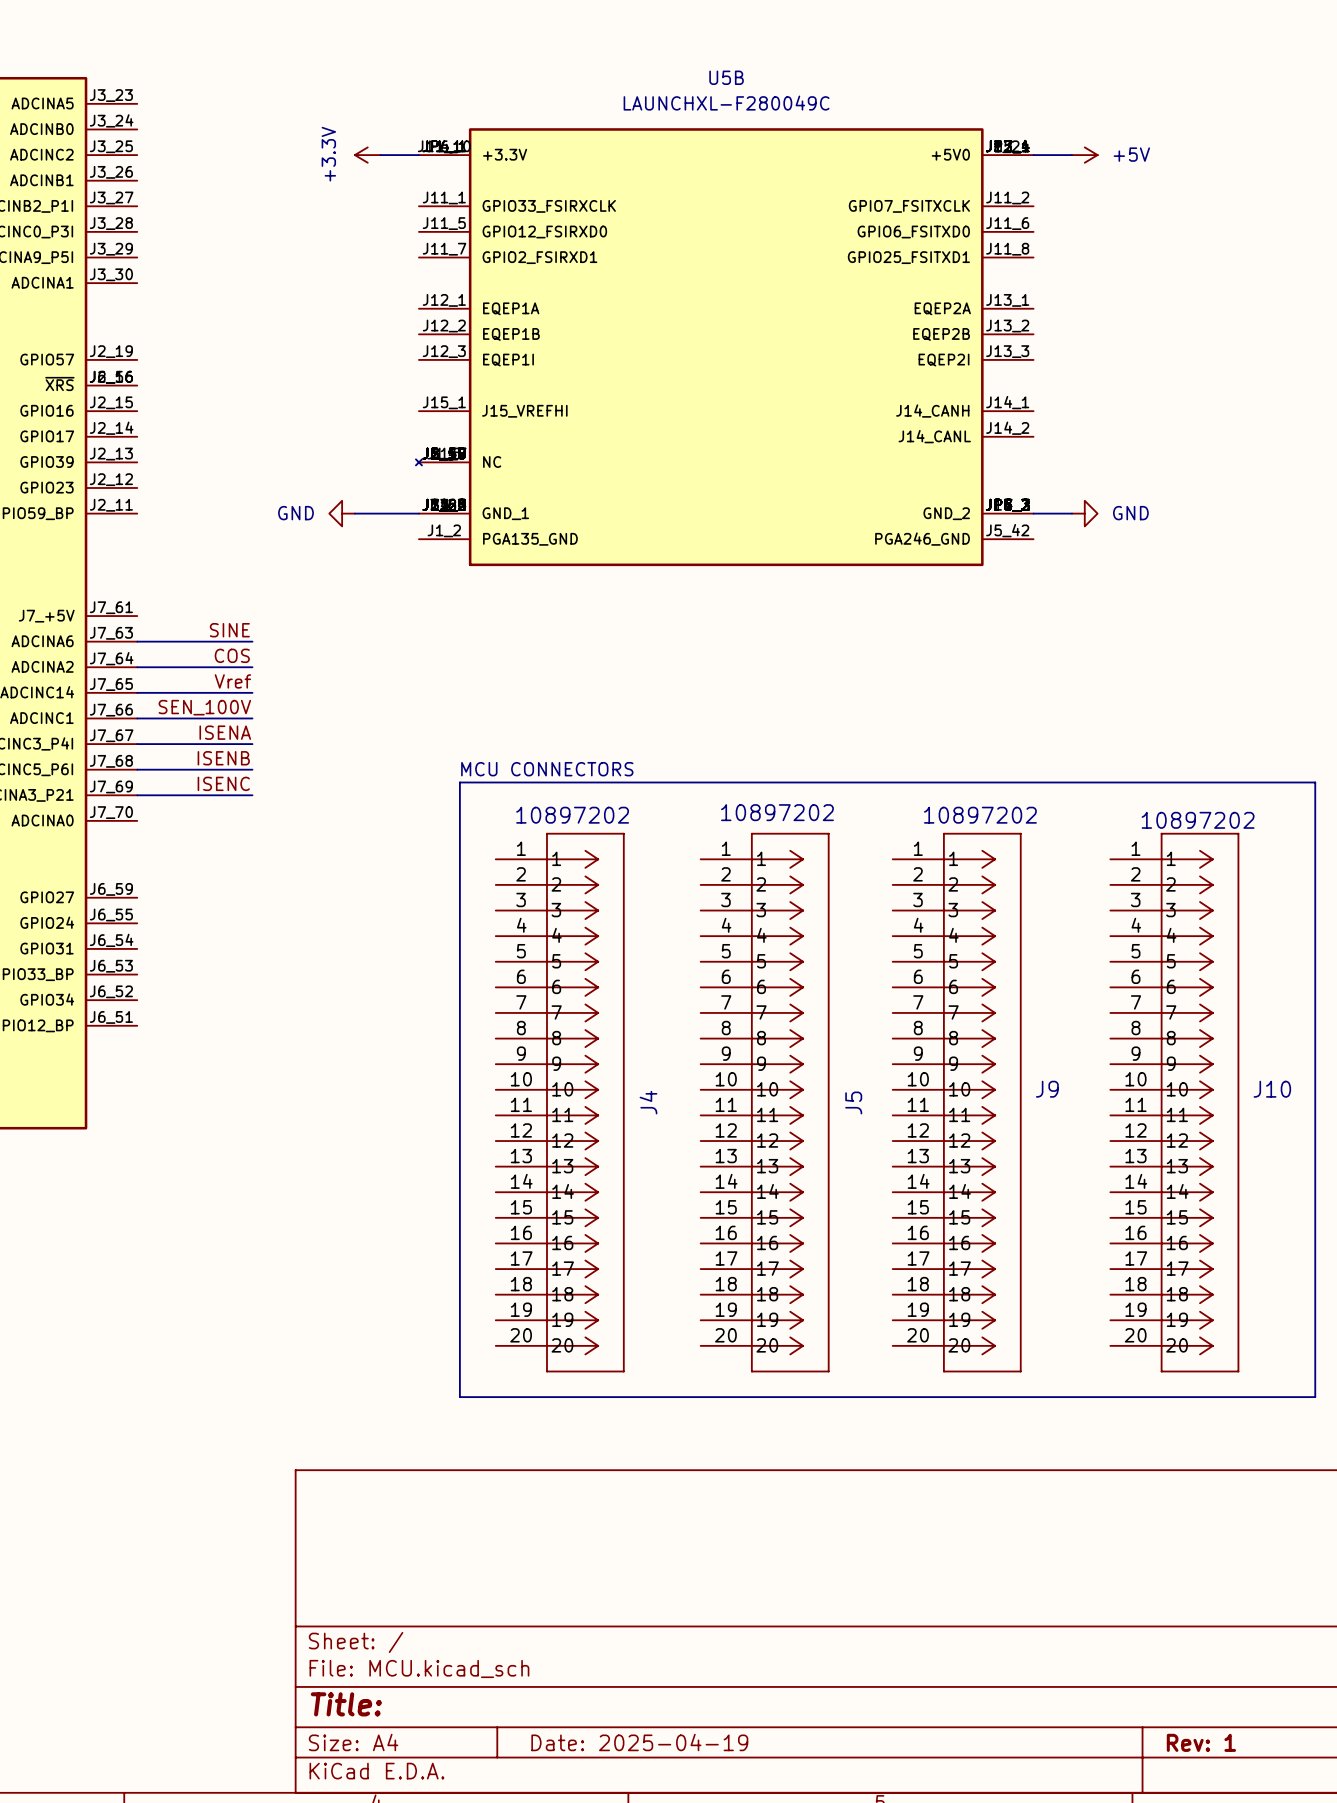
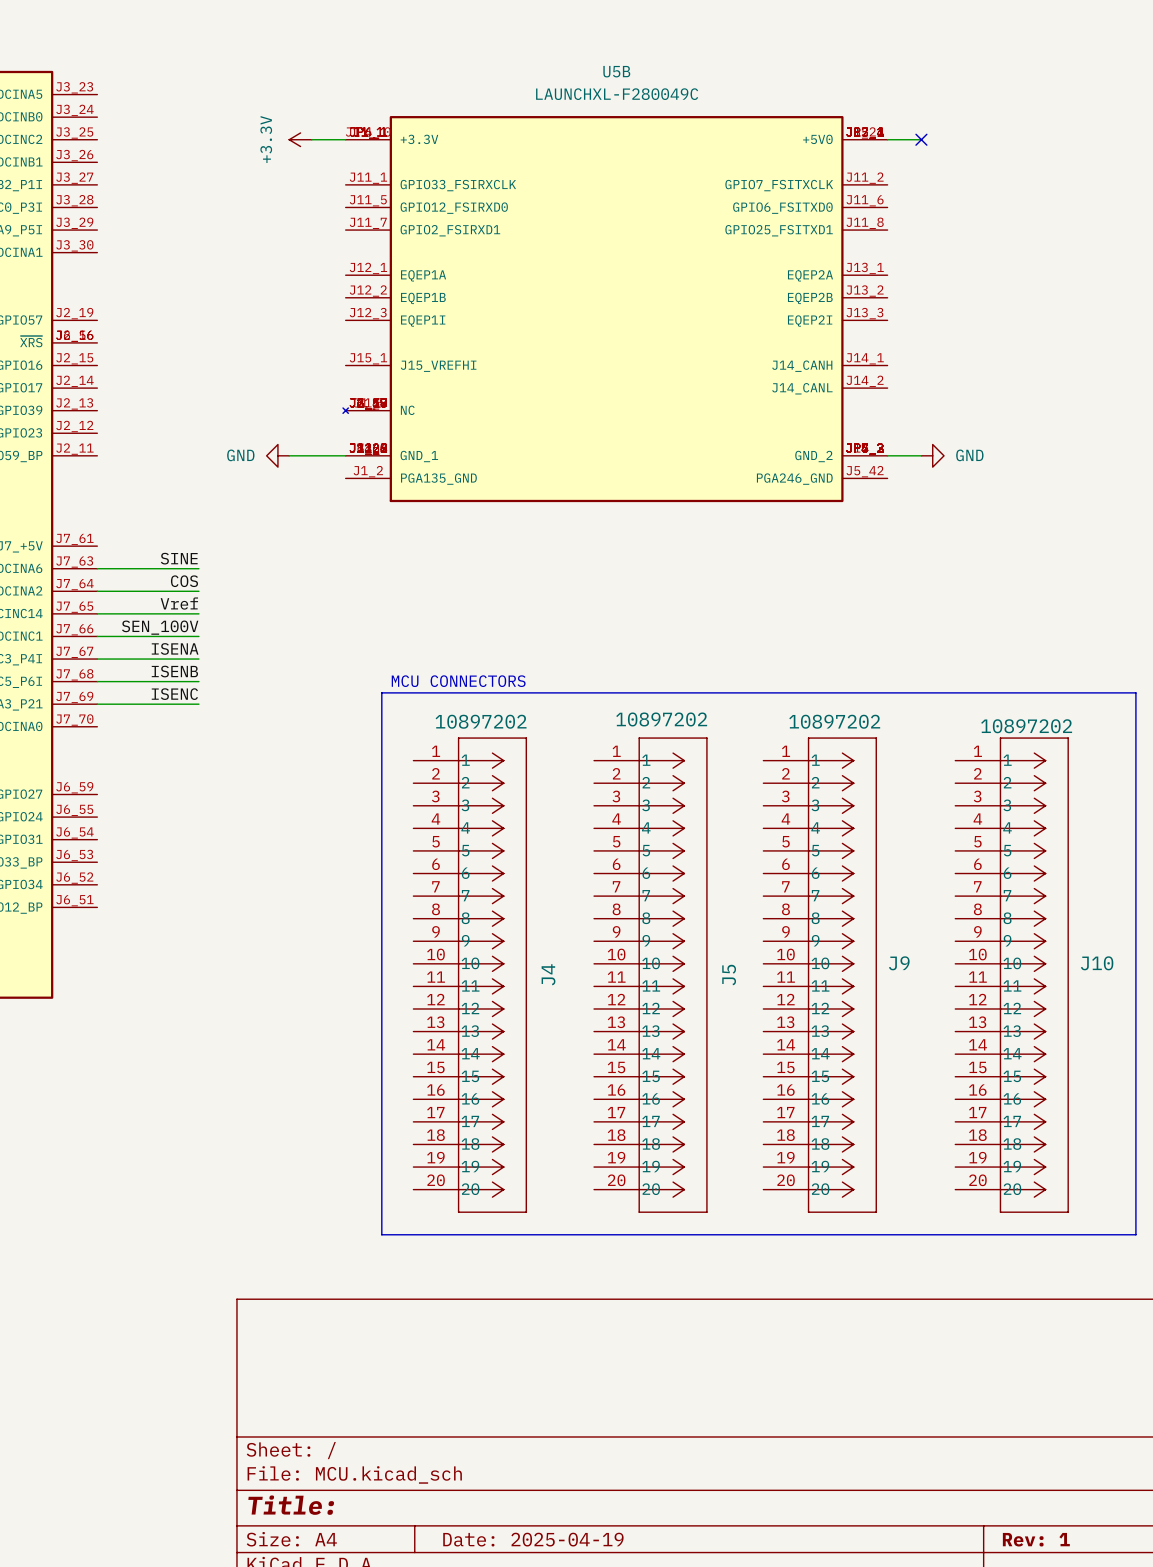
no-connect mark: none -> (921, 139)
power symbol: +5V (1084, 155) -> none

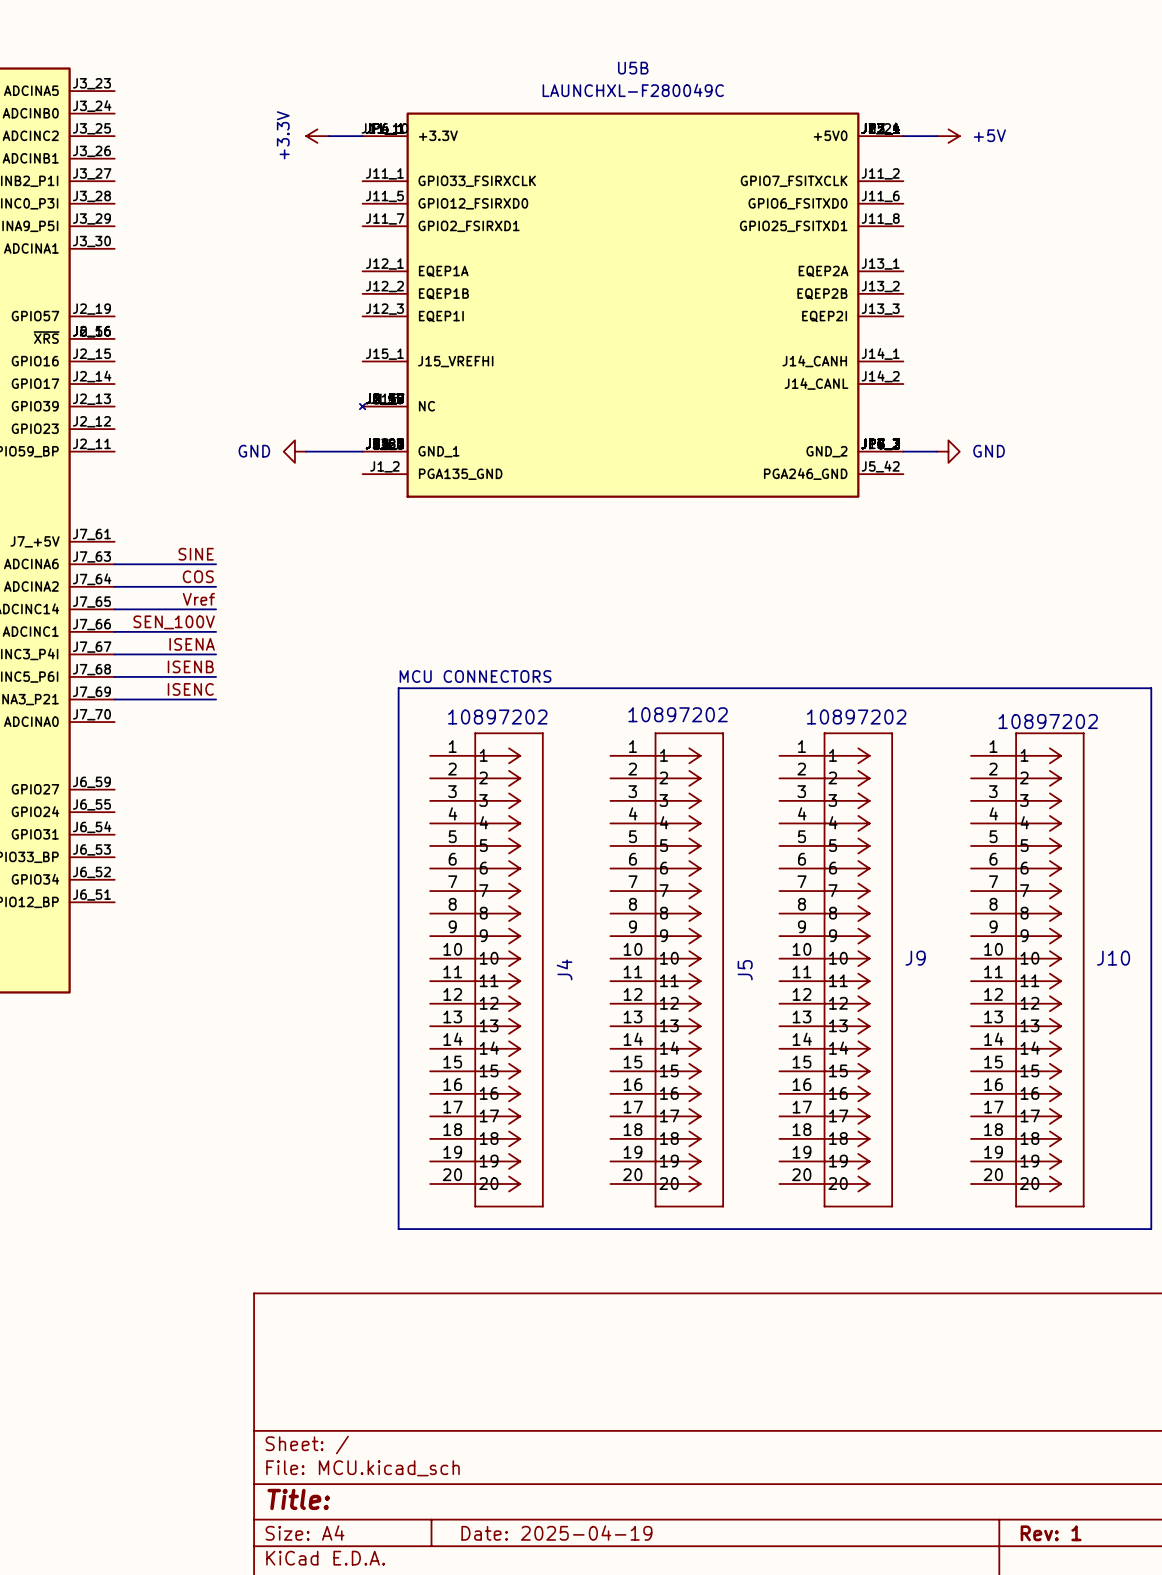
no-connect mark: (921, 139) -> none
power symbol: none -> +5V (948, 136)

